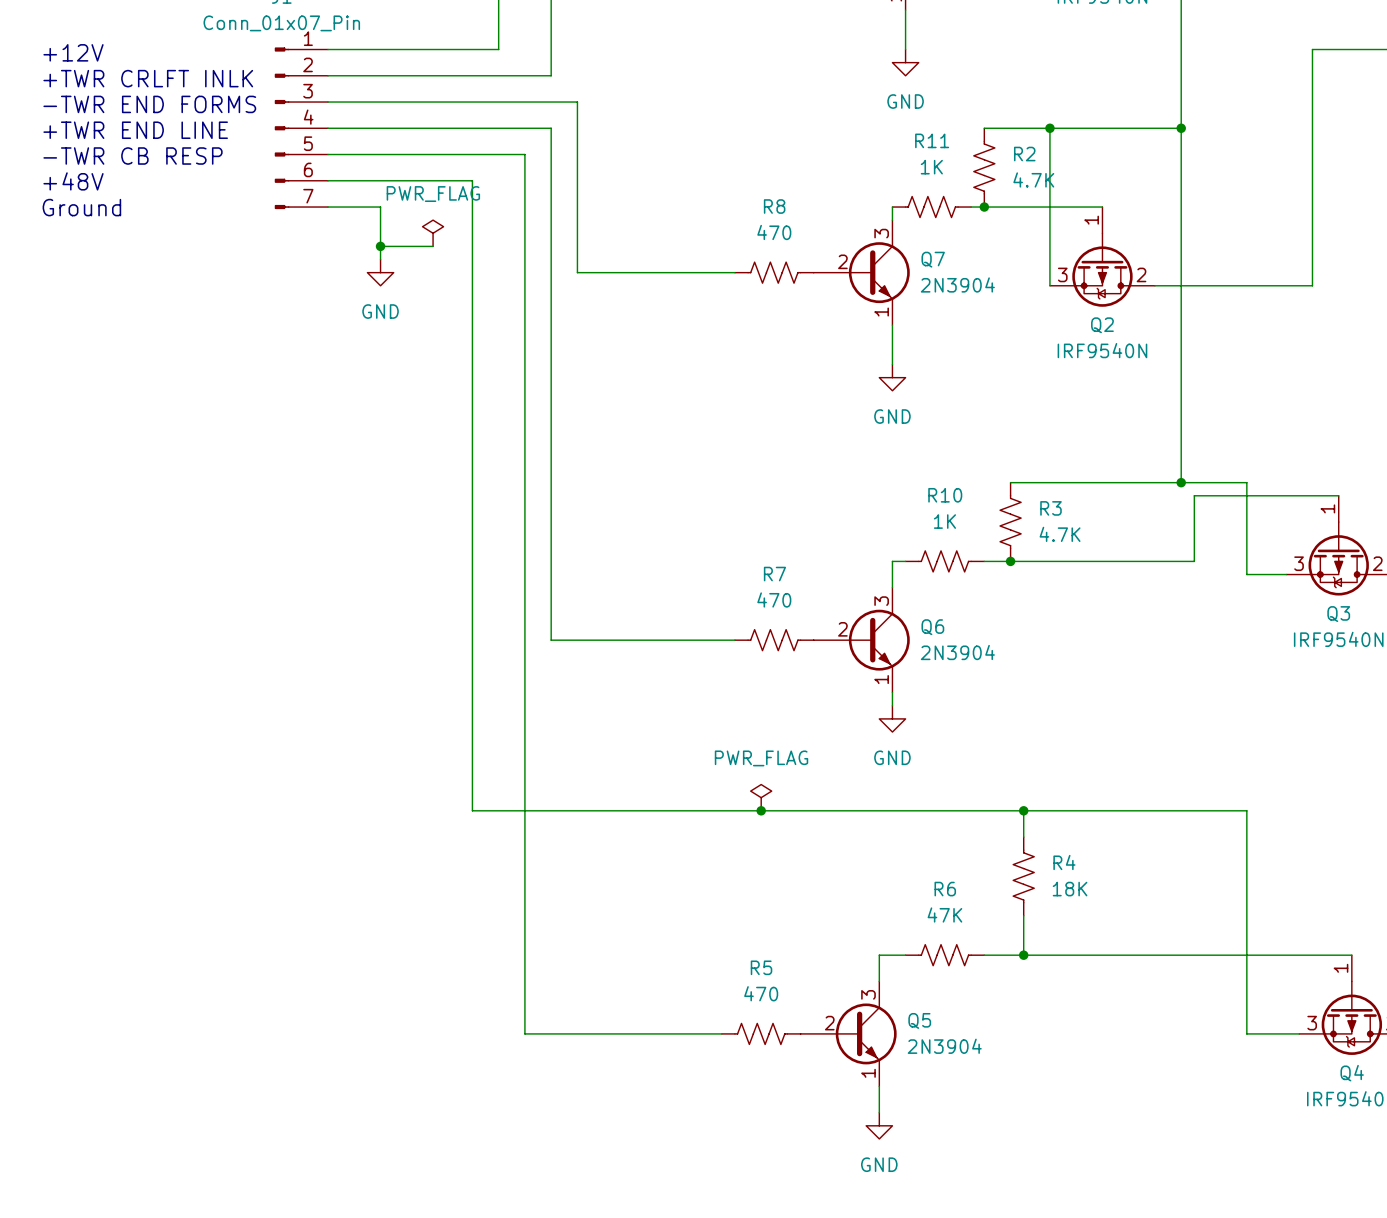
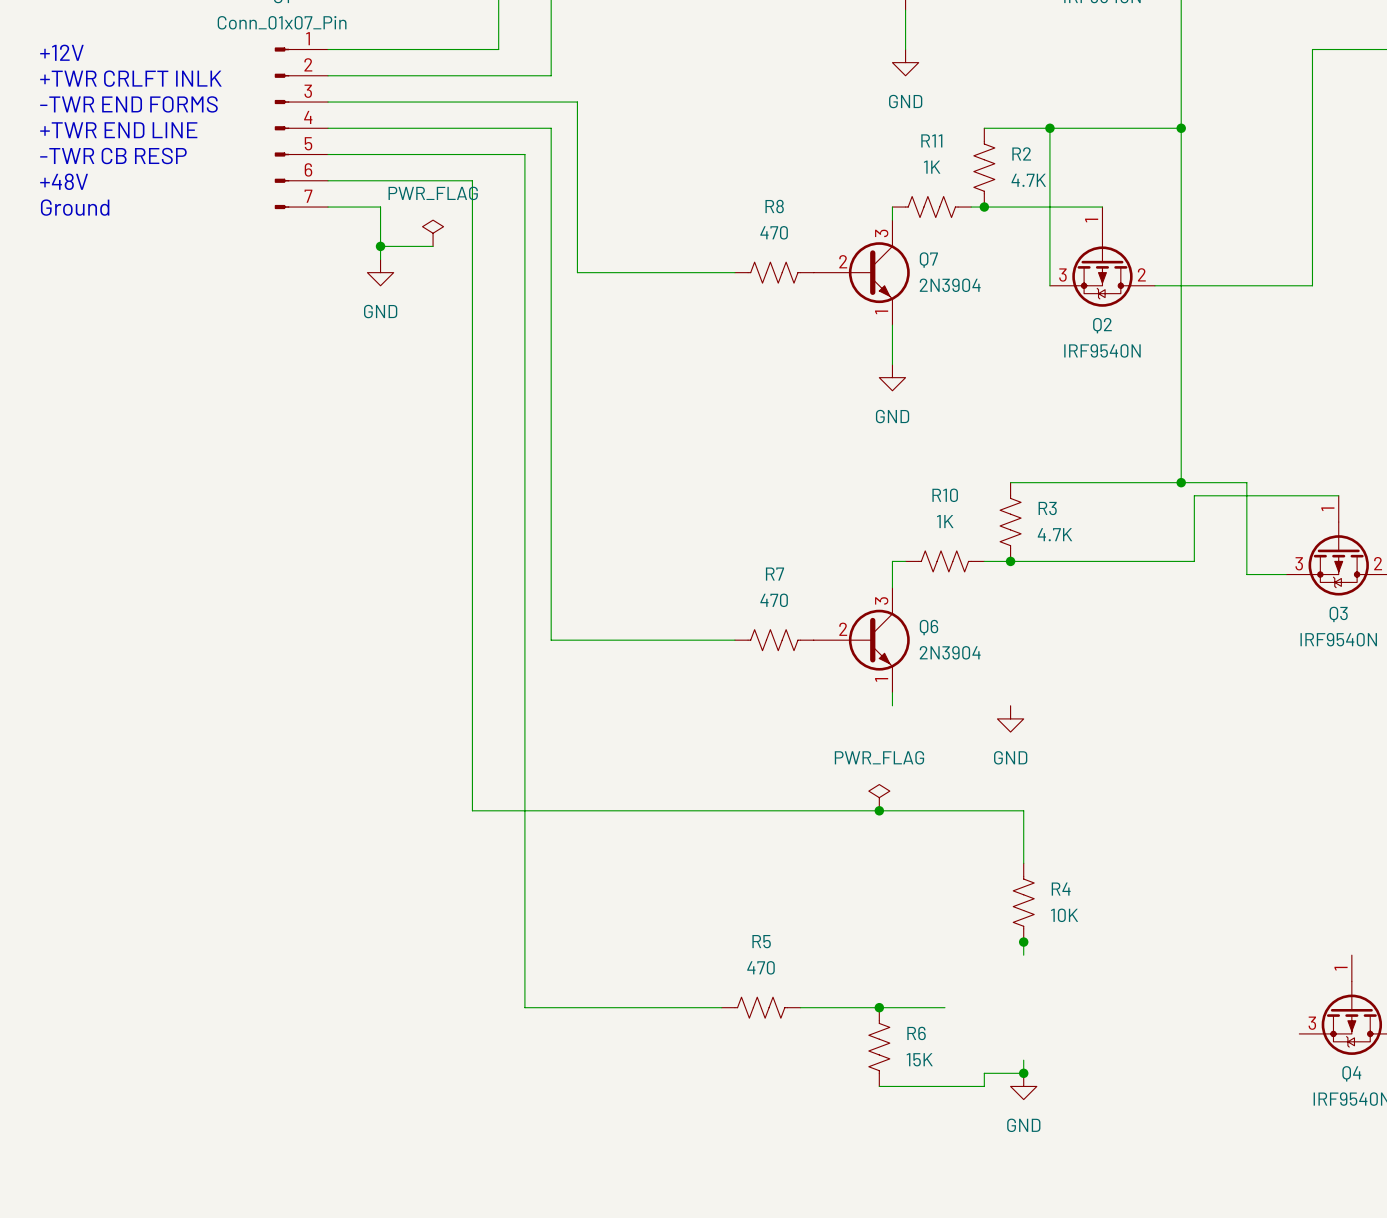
power symbol position: GND (892, 718) -> GND (1010, 718)
power symbol position: PWR_FLAG (761, 797) -> PWR_FLAG (879, 797)
junction: (761, 810) -> none
junction: none -> (879, 810)
wire: (1023, 810) (1246, 810) (1246, 1033) (1299, 1033) -> none
junction: (1023, 810) -> none
R4 position: (1023, 876) -> (1023, 902)
R6 name position: R6 (945, 889) -> R6 (916, 1033)
R4 value: 18K (1070, 889) -> 10K (1064, 915)
R6 value: 47K (944, 915) -> 15K (919, 1059)
wire: (905, 955) (879, 955) (879, 981) -> none
R6 rotation: 0° (944, 955) -> 90° clockwise (879, 1047)
R6 position: (944, 955) -> (879, 1047)
wire: (984, 955) (1351, 955) -> none
junction position: (1023, 955) -> (1023, 942)
wire: (524, 1007) (524, 1033) (721, 1033) -> (524, 1007) (721, 1007)
wire: none -> (800, 1007) (944, 1007)
junction: none -> (879, 1007)
R5 position: (761, 1033) -> (761, 1007)
Q5: 2N3904 (848, 1033) -> none
junction: none -> (1023, 1073)
wire: (879, 1086) (879, 1112) -> (879, 1086) (984, 1086) (984, 1073) (1023, 1073) (1023, 1060)
power symbol position: GND (879, 1125) -> GND (1023, 1086)

